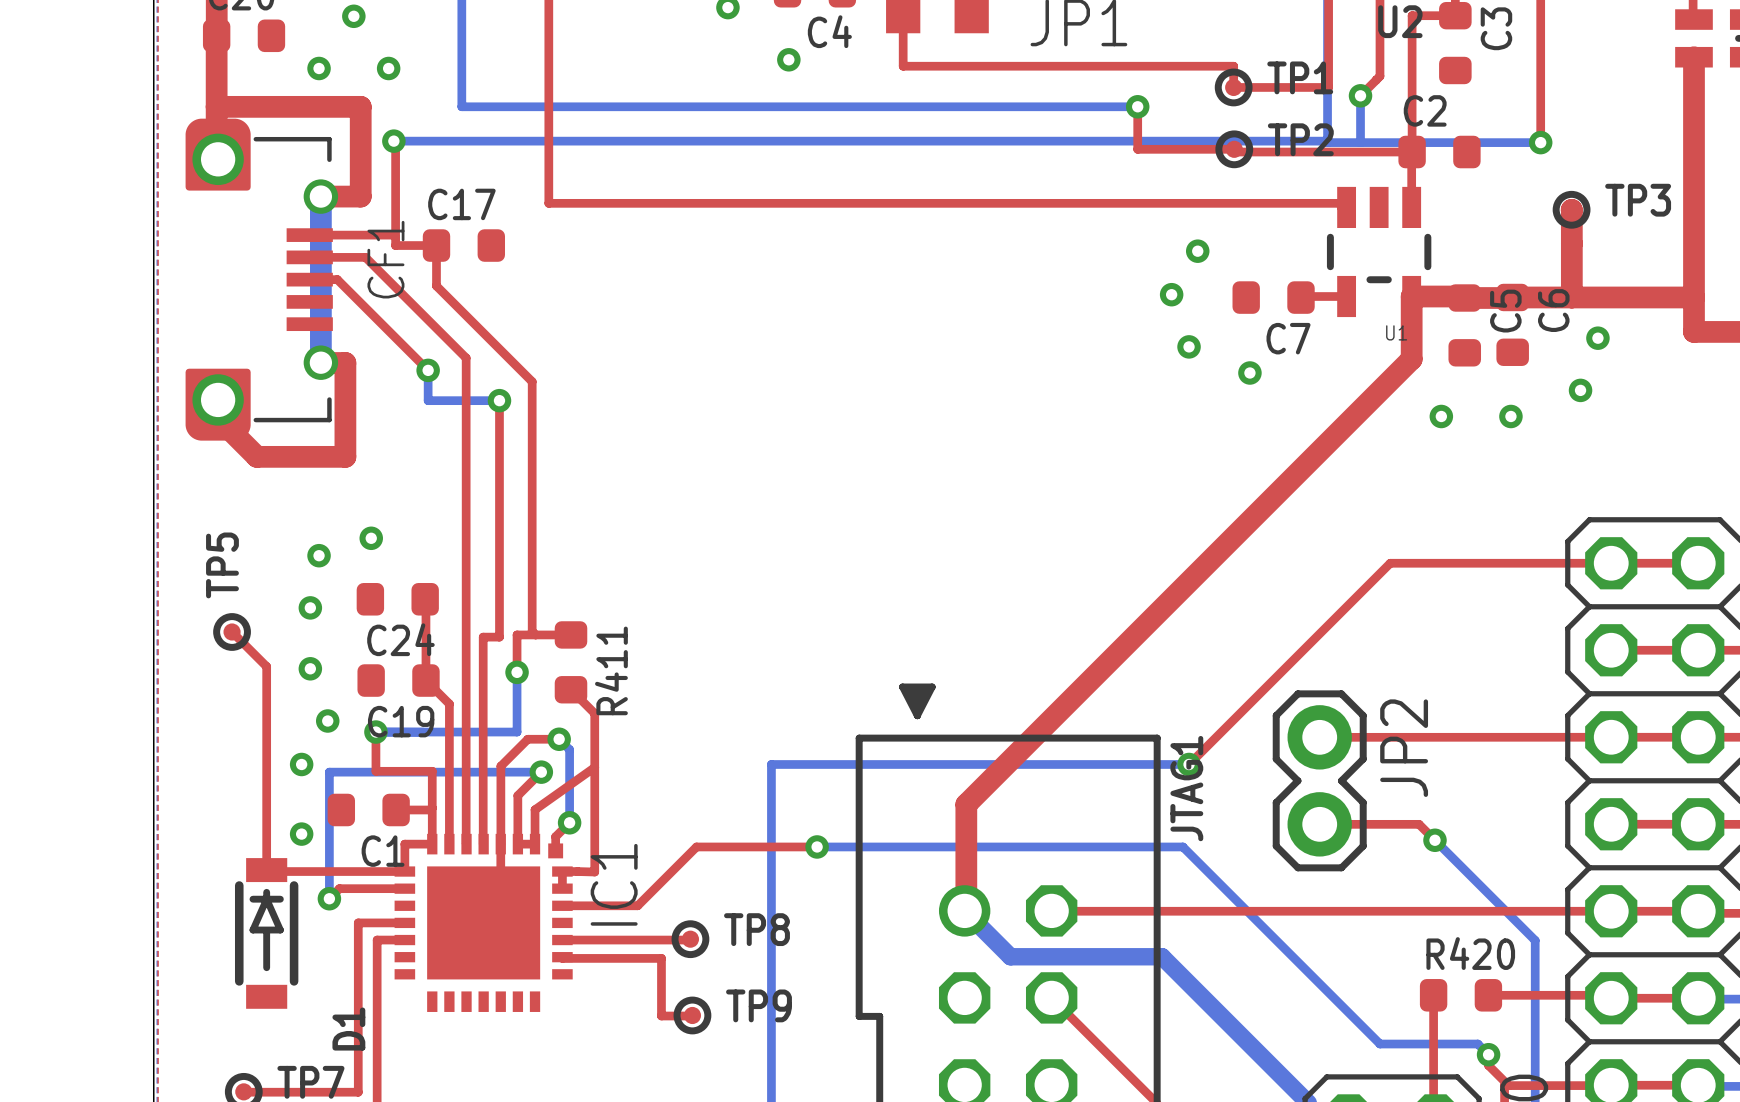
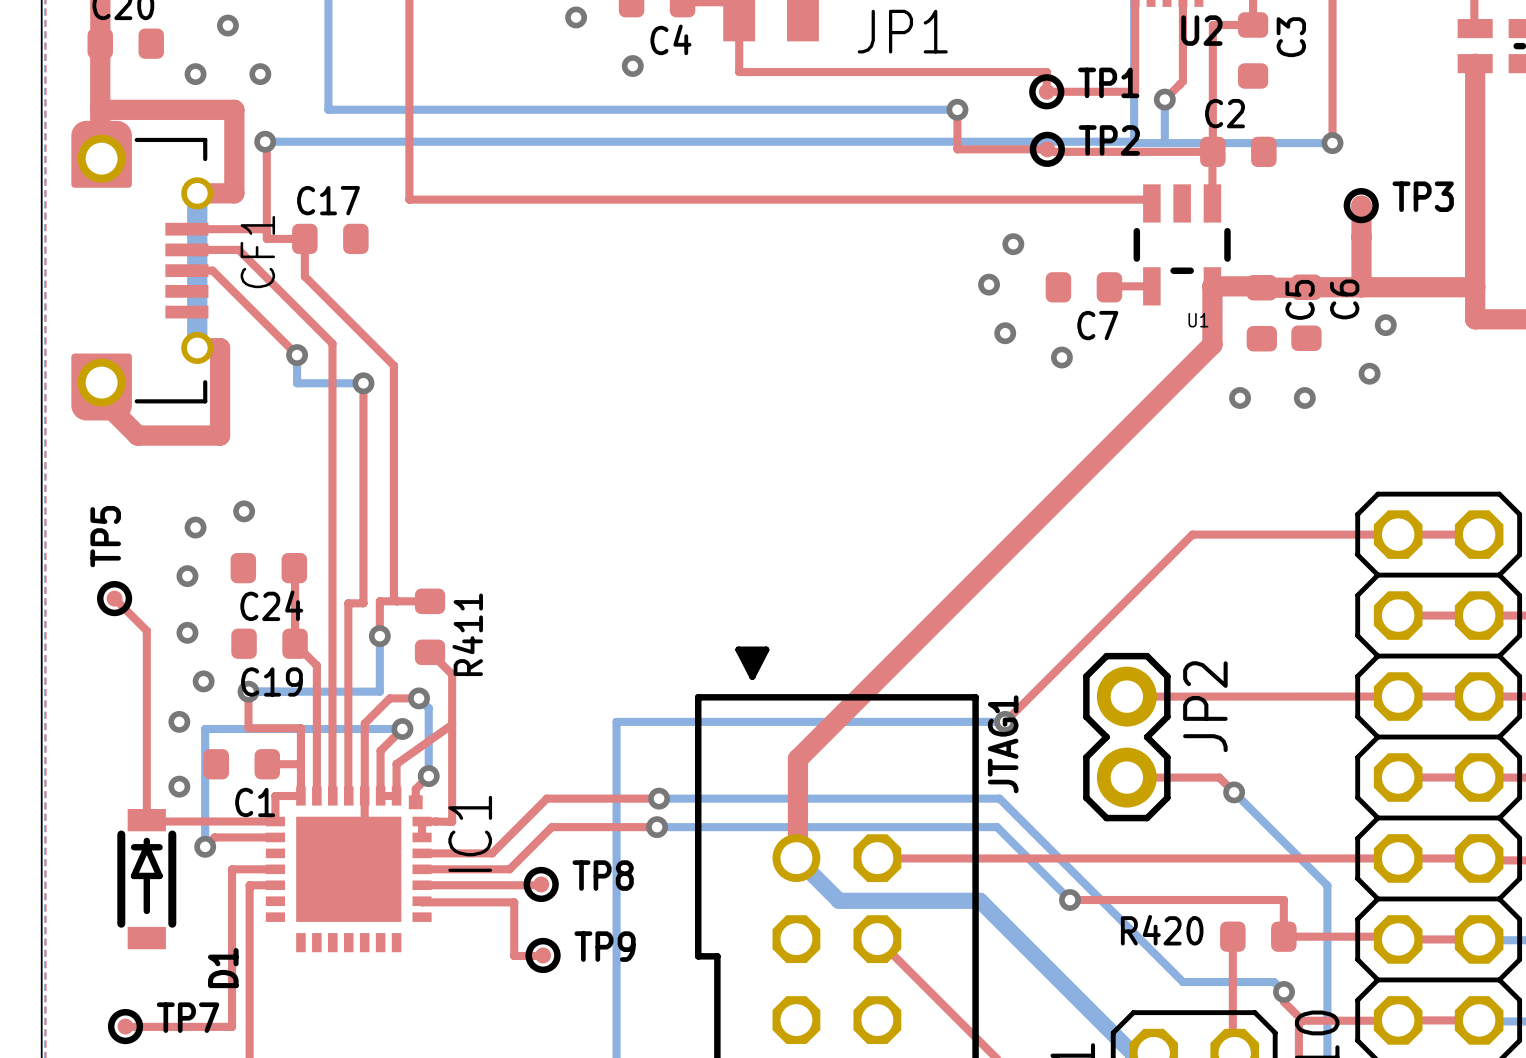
top track: none -> (657, 827) (551, 827) (509, 869) (422, 869)
bottom track: none -> (657, 827) (997, 827) (1070, 900)
via: none -> (657, 827)
R420 name position: R420 (1470, 953) -> R420 (1162, 930)
top track: none -> (1070, 900) (1283, 900) (1283, 936)
via: none -> (1070, 900)

